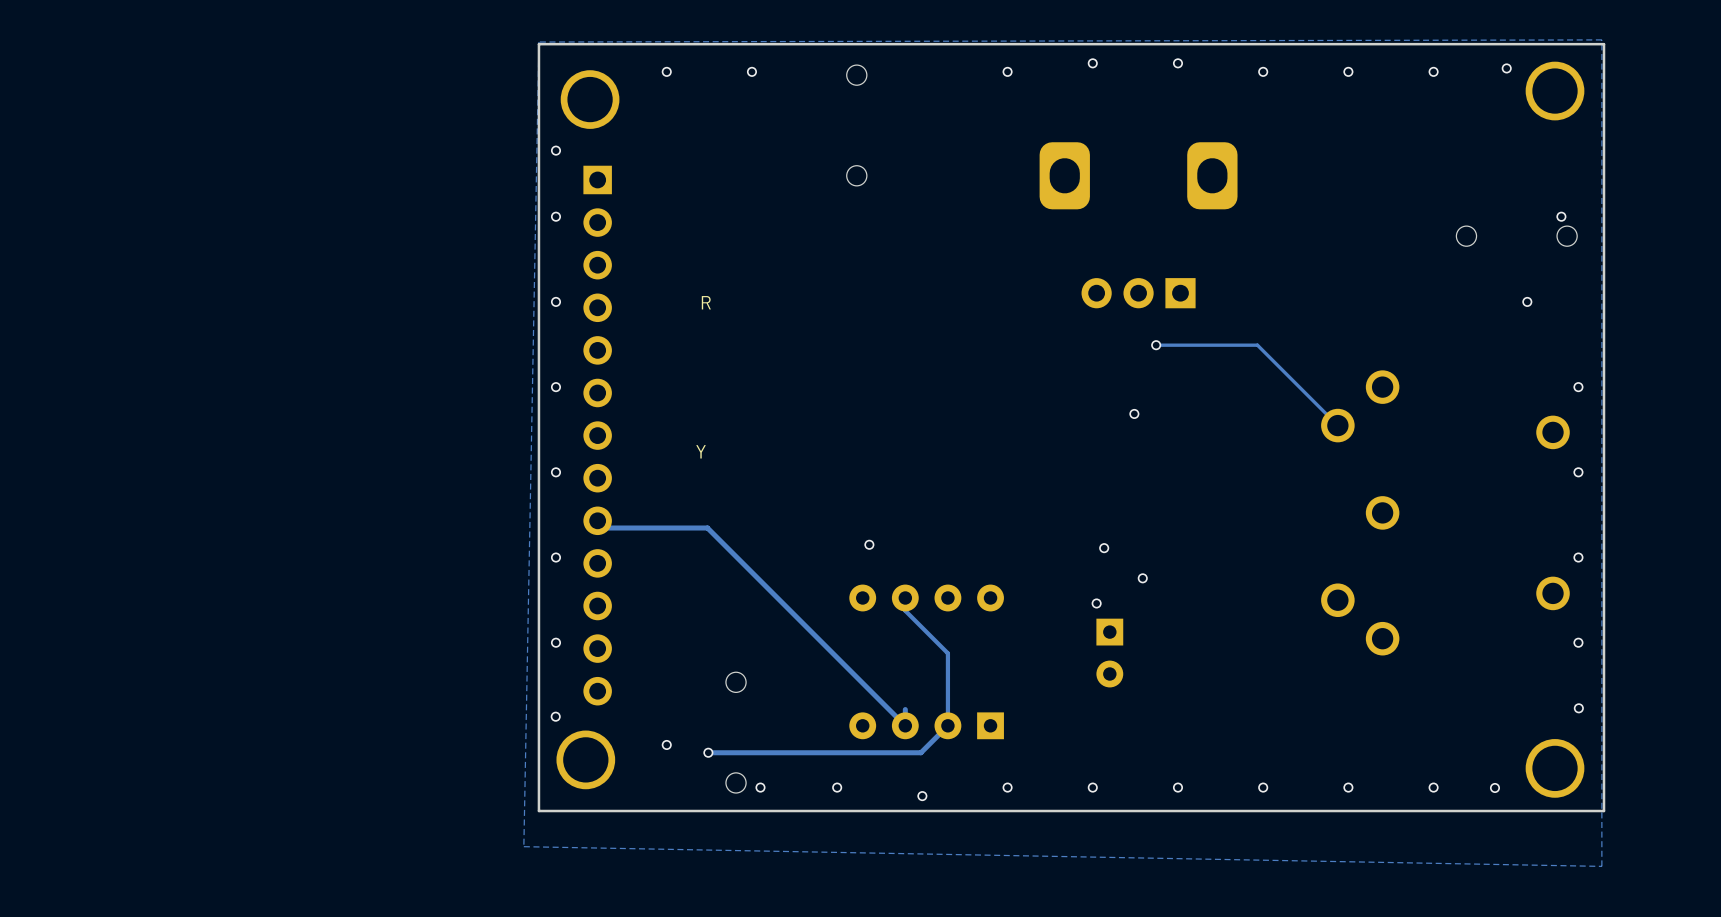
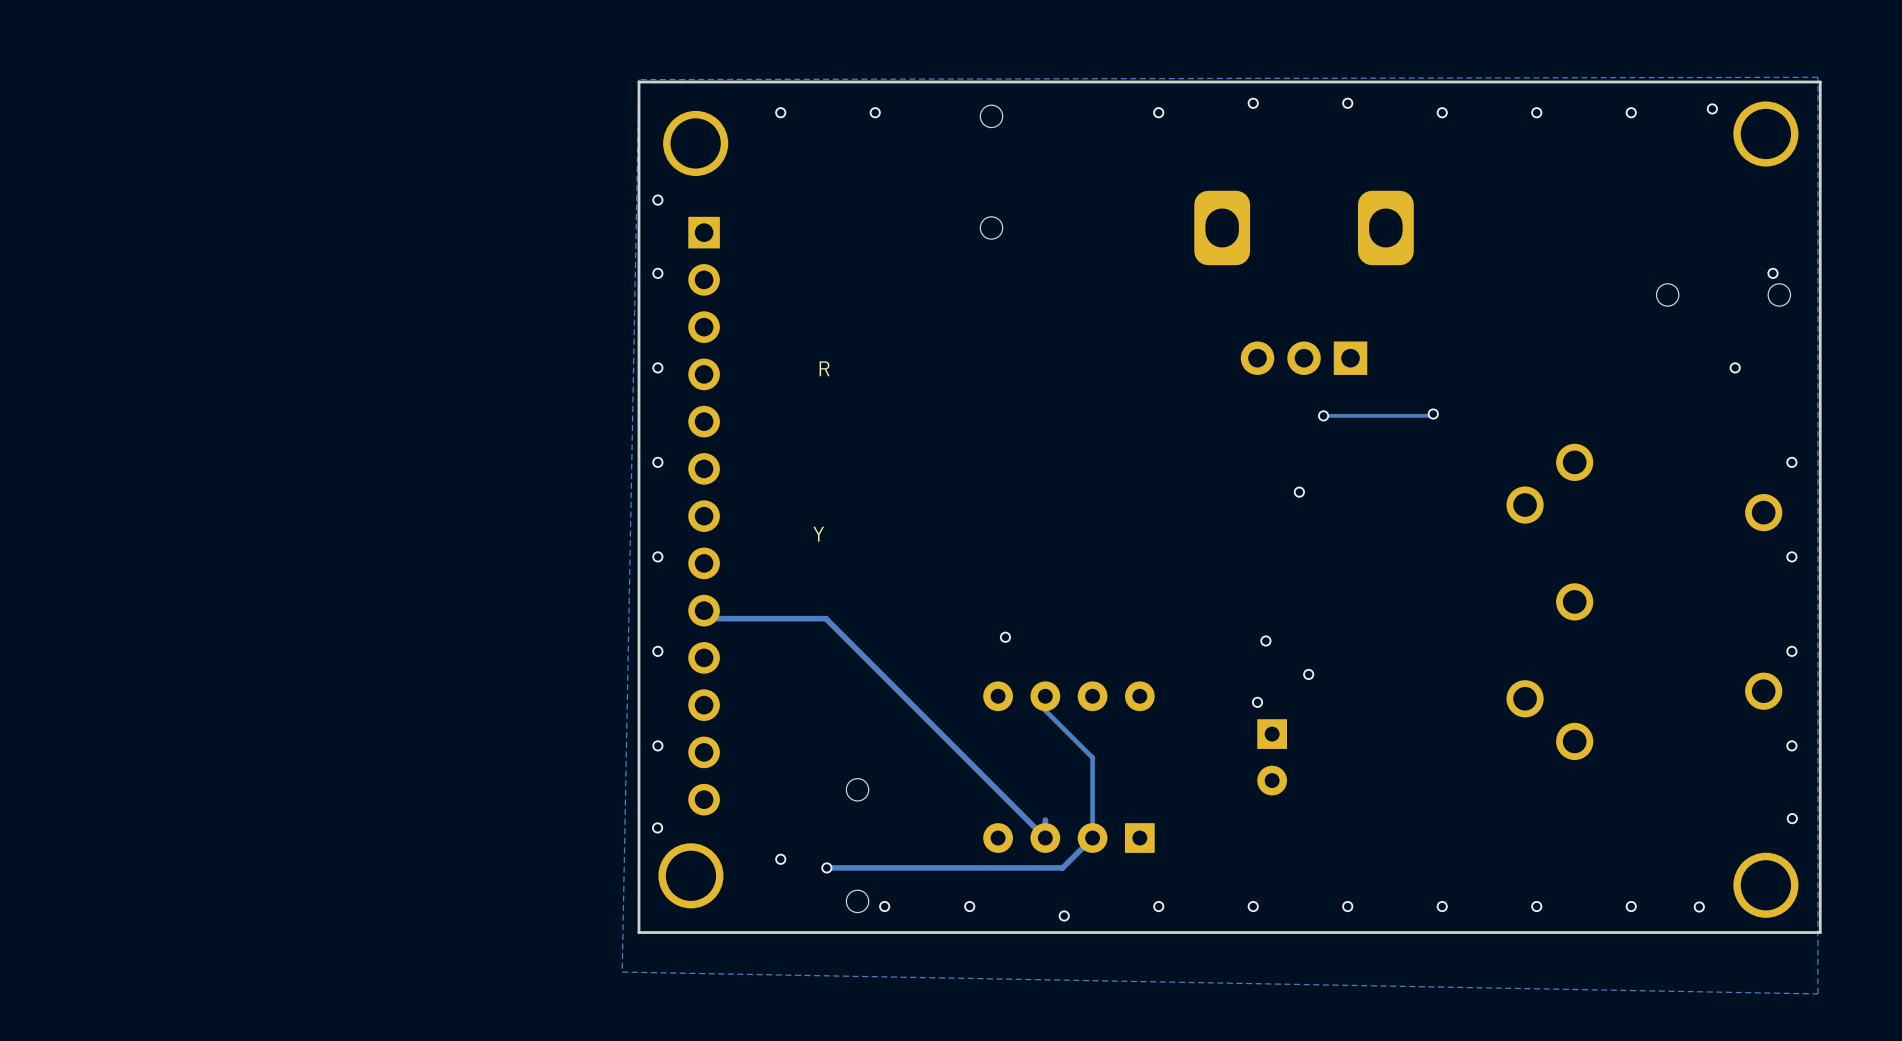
via: none -> (1433, 414)
track: (1257, 345) (1337, 425) -> none

